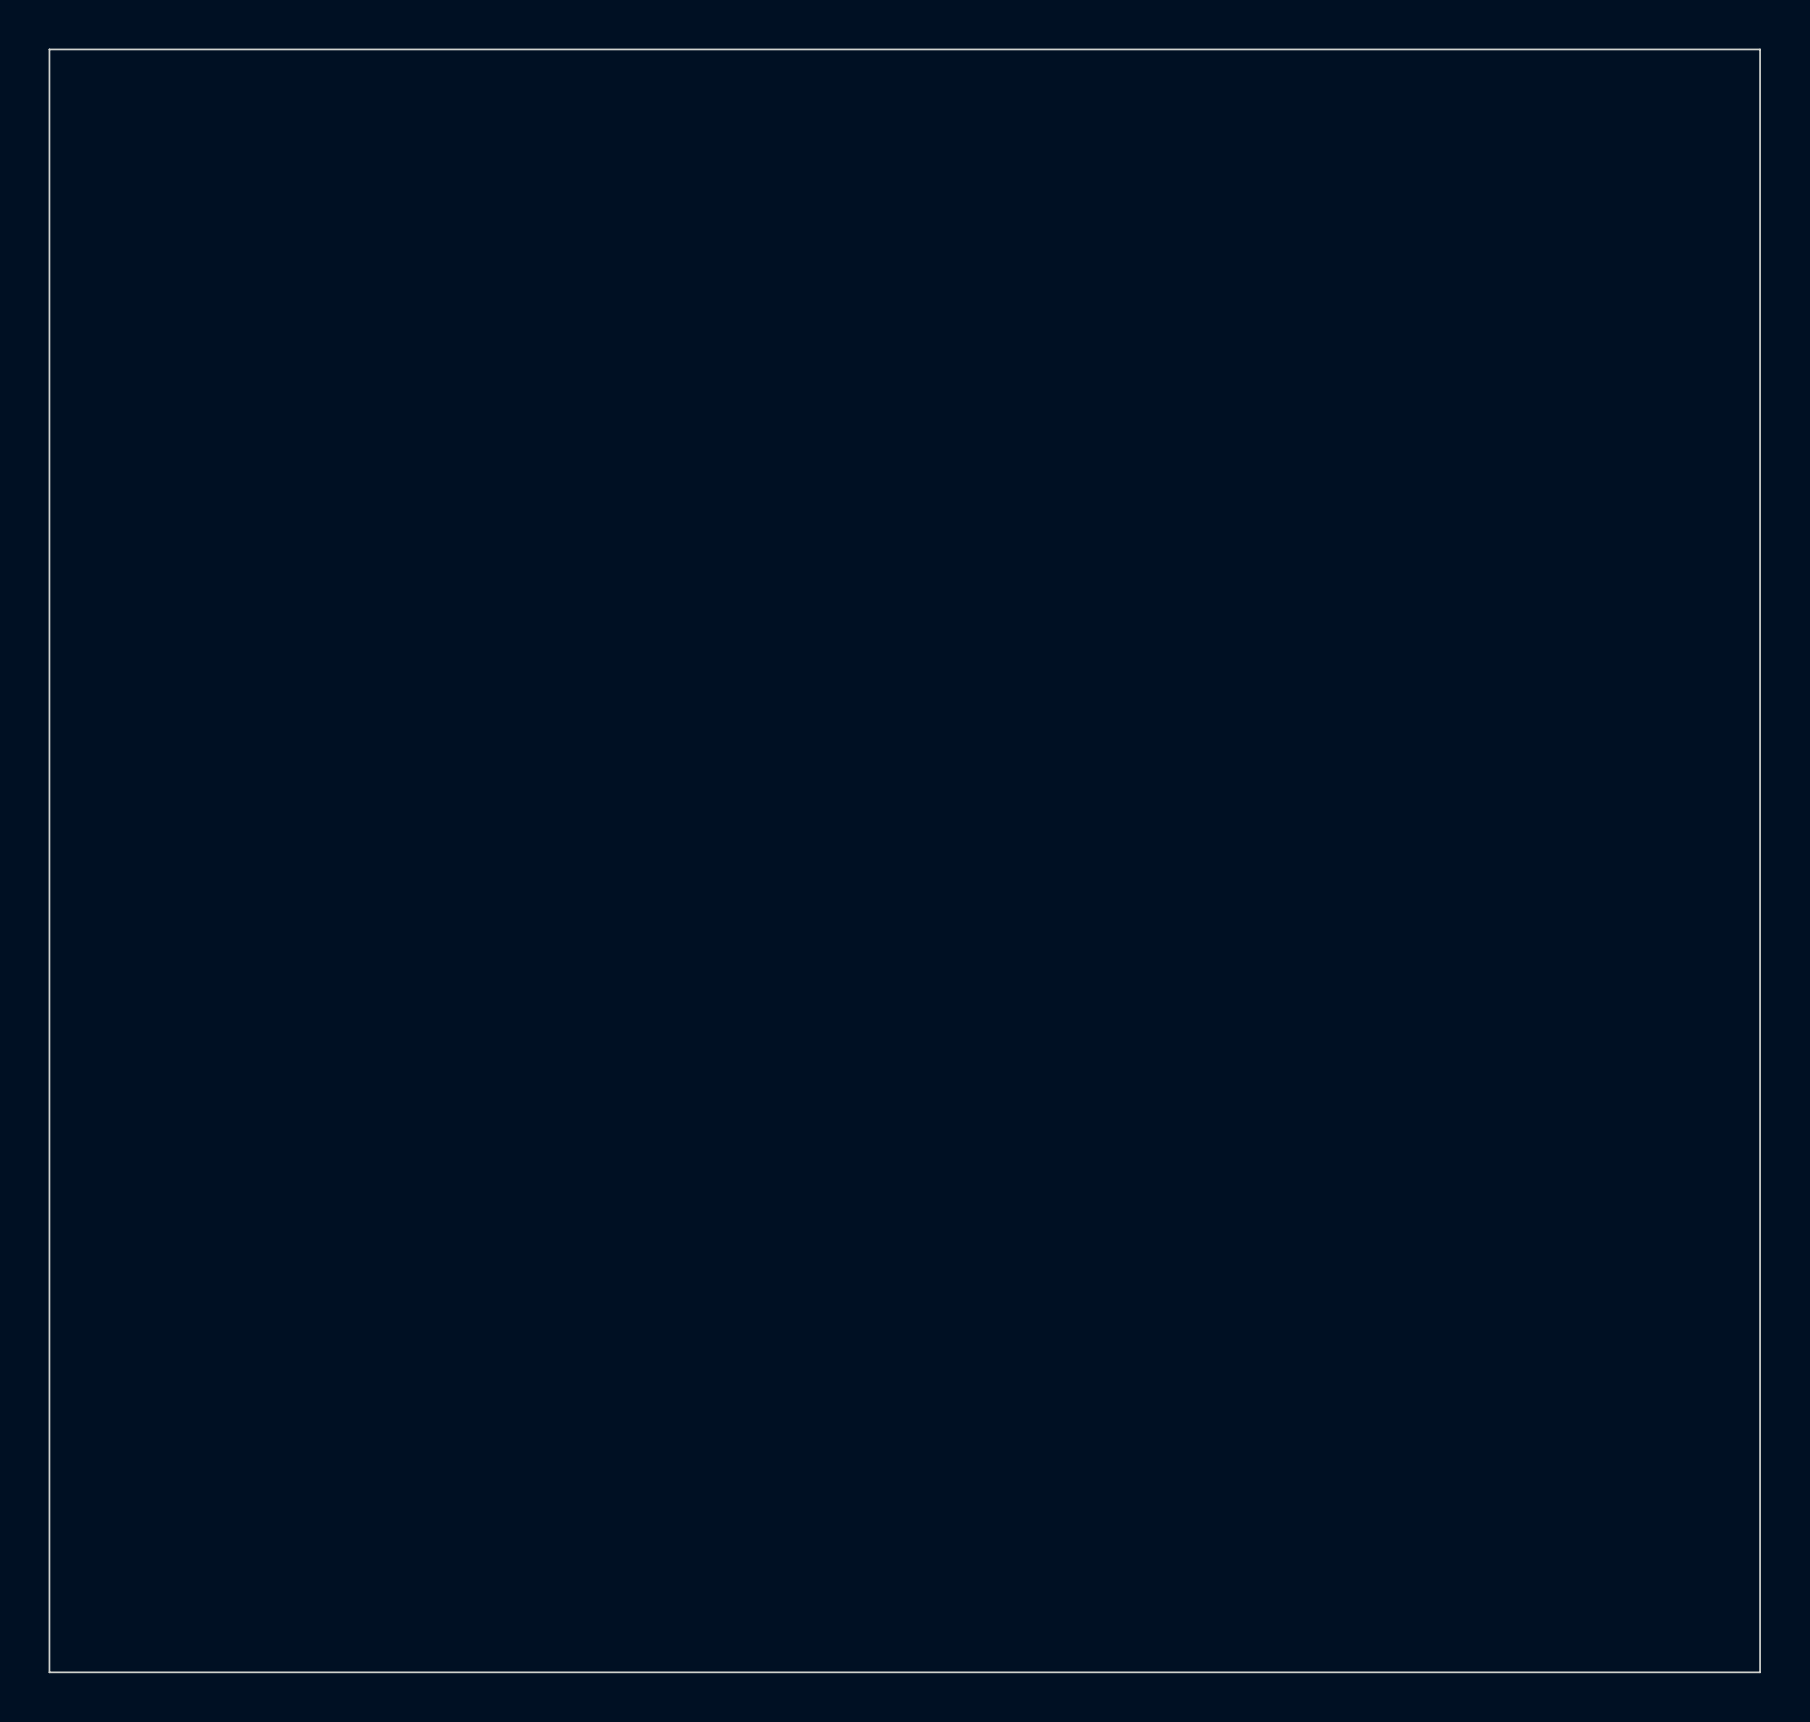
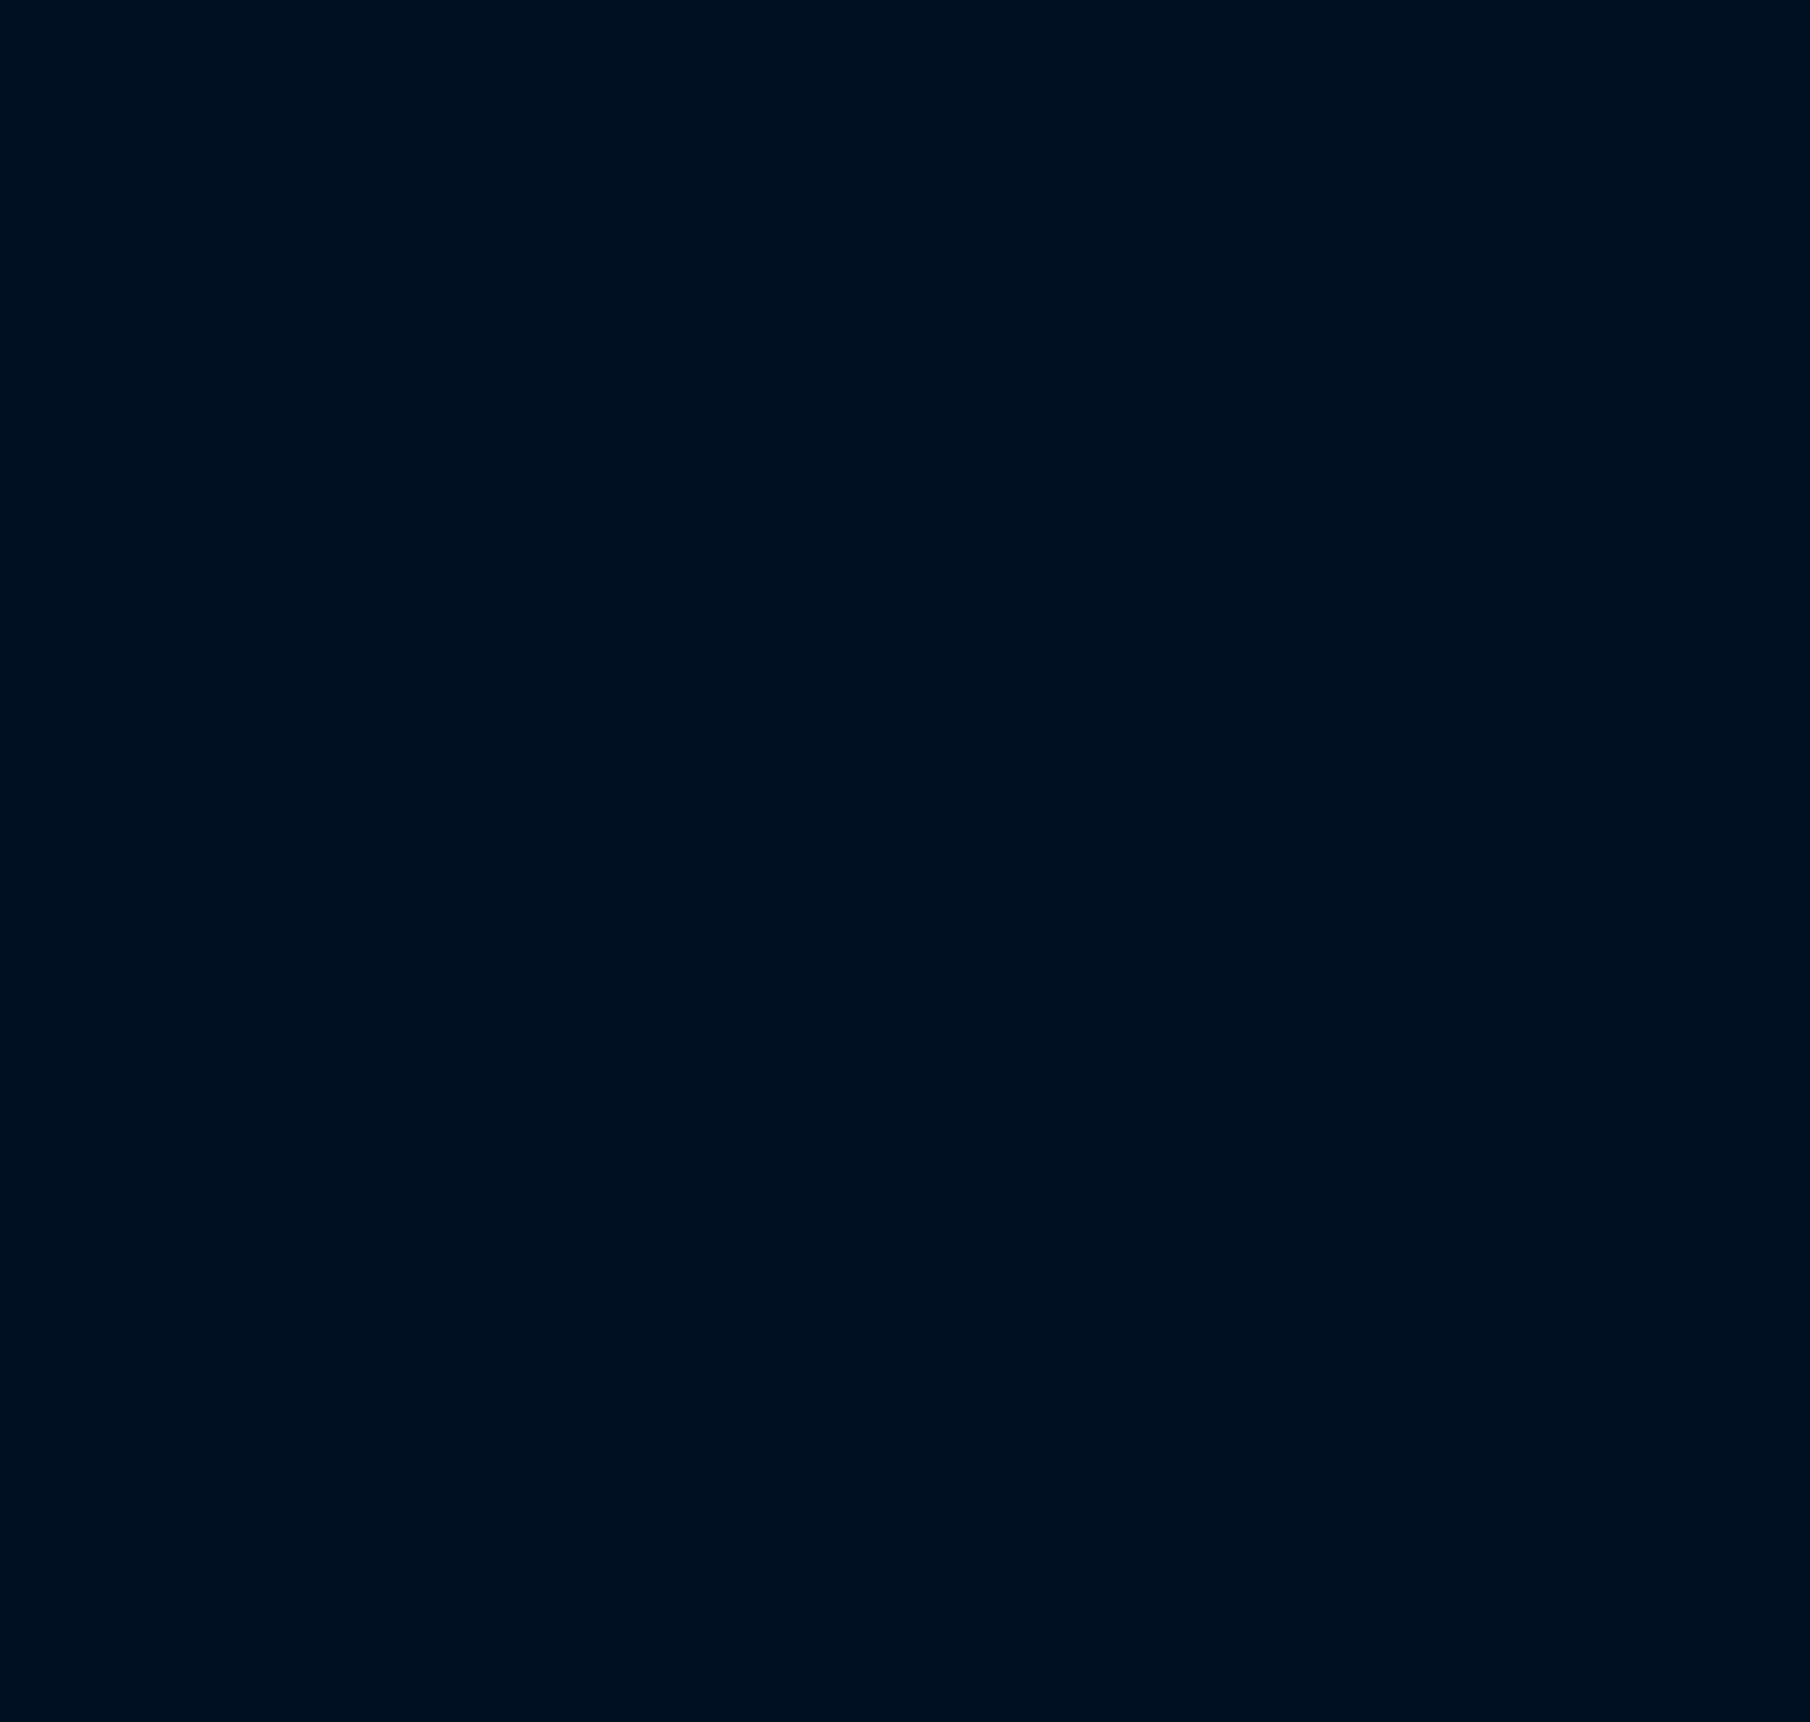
board edge: (49, 49) (1760, 49) (1760, 1672) (49, 1672) (49, 49) -> none

